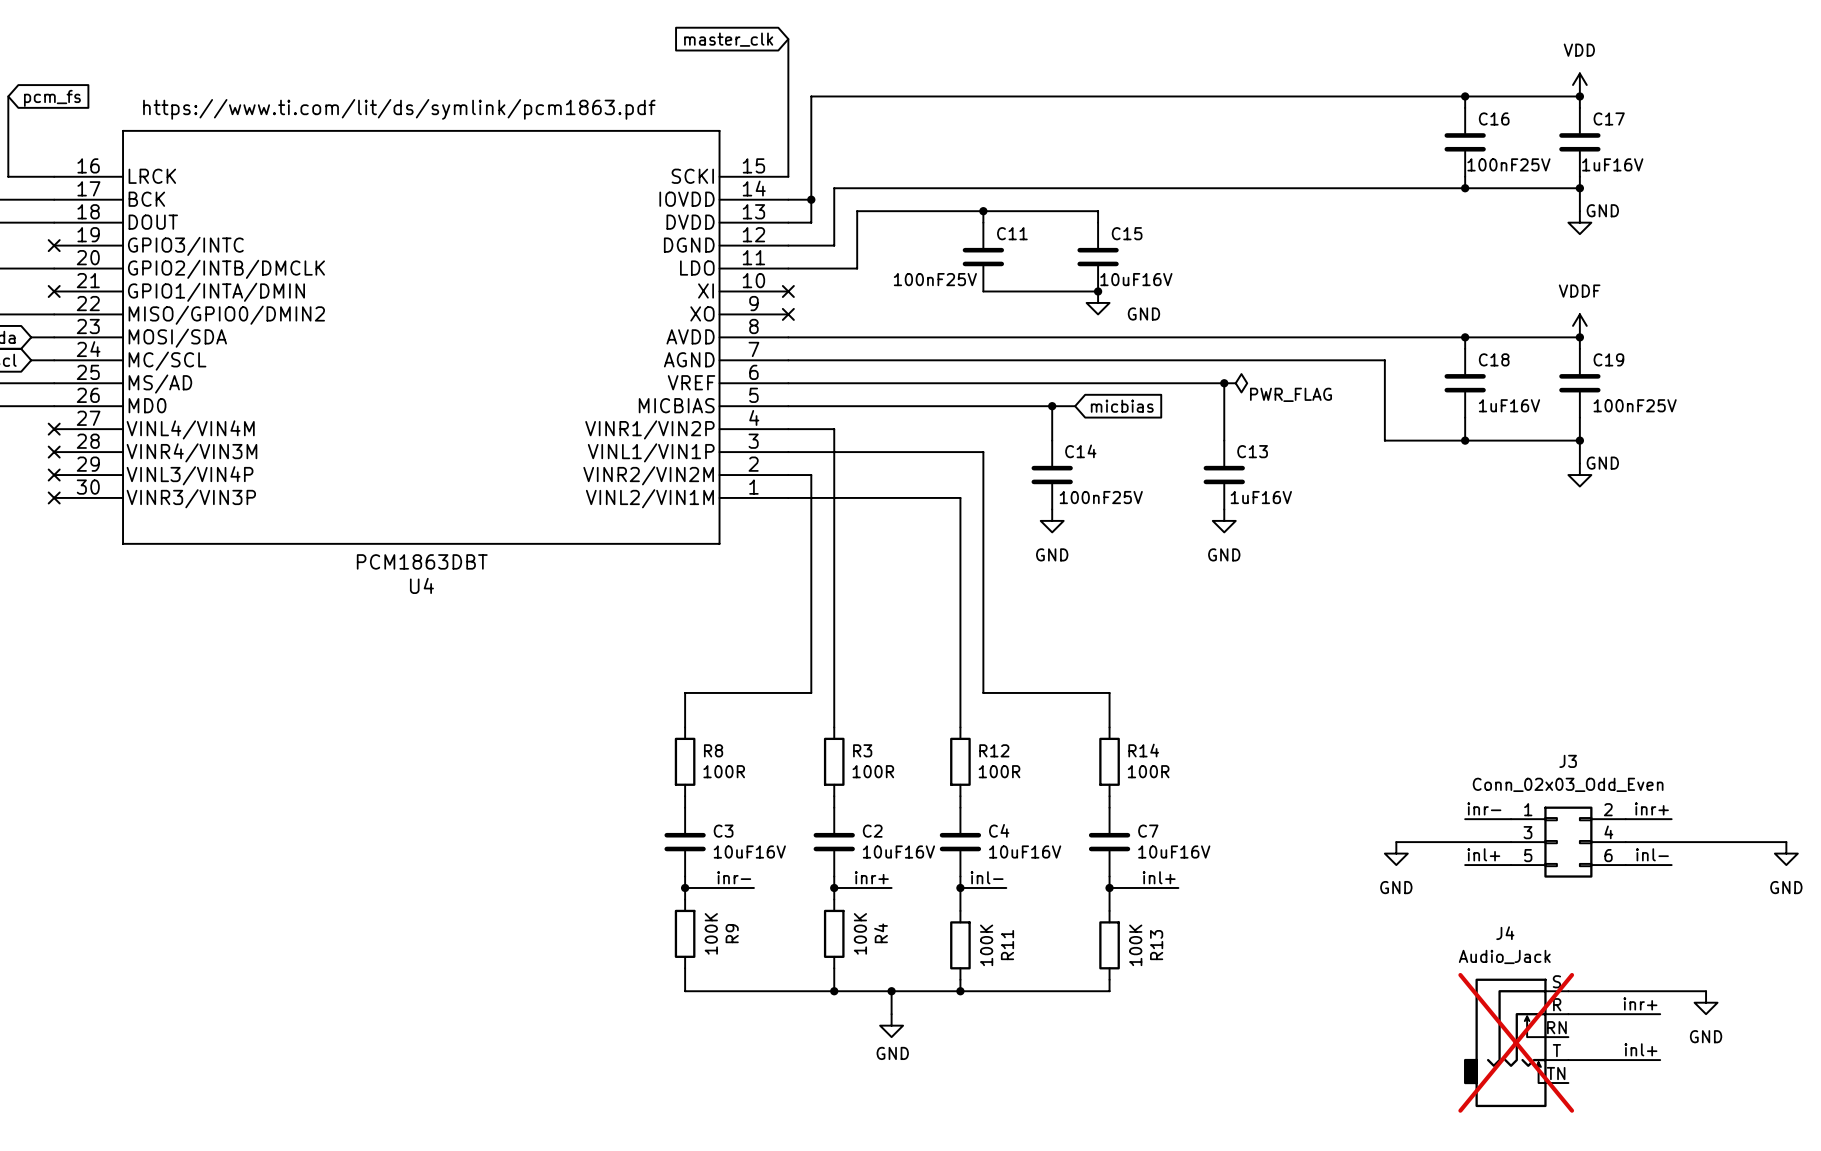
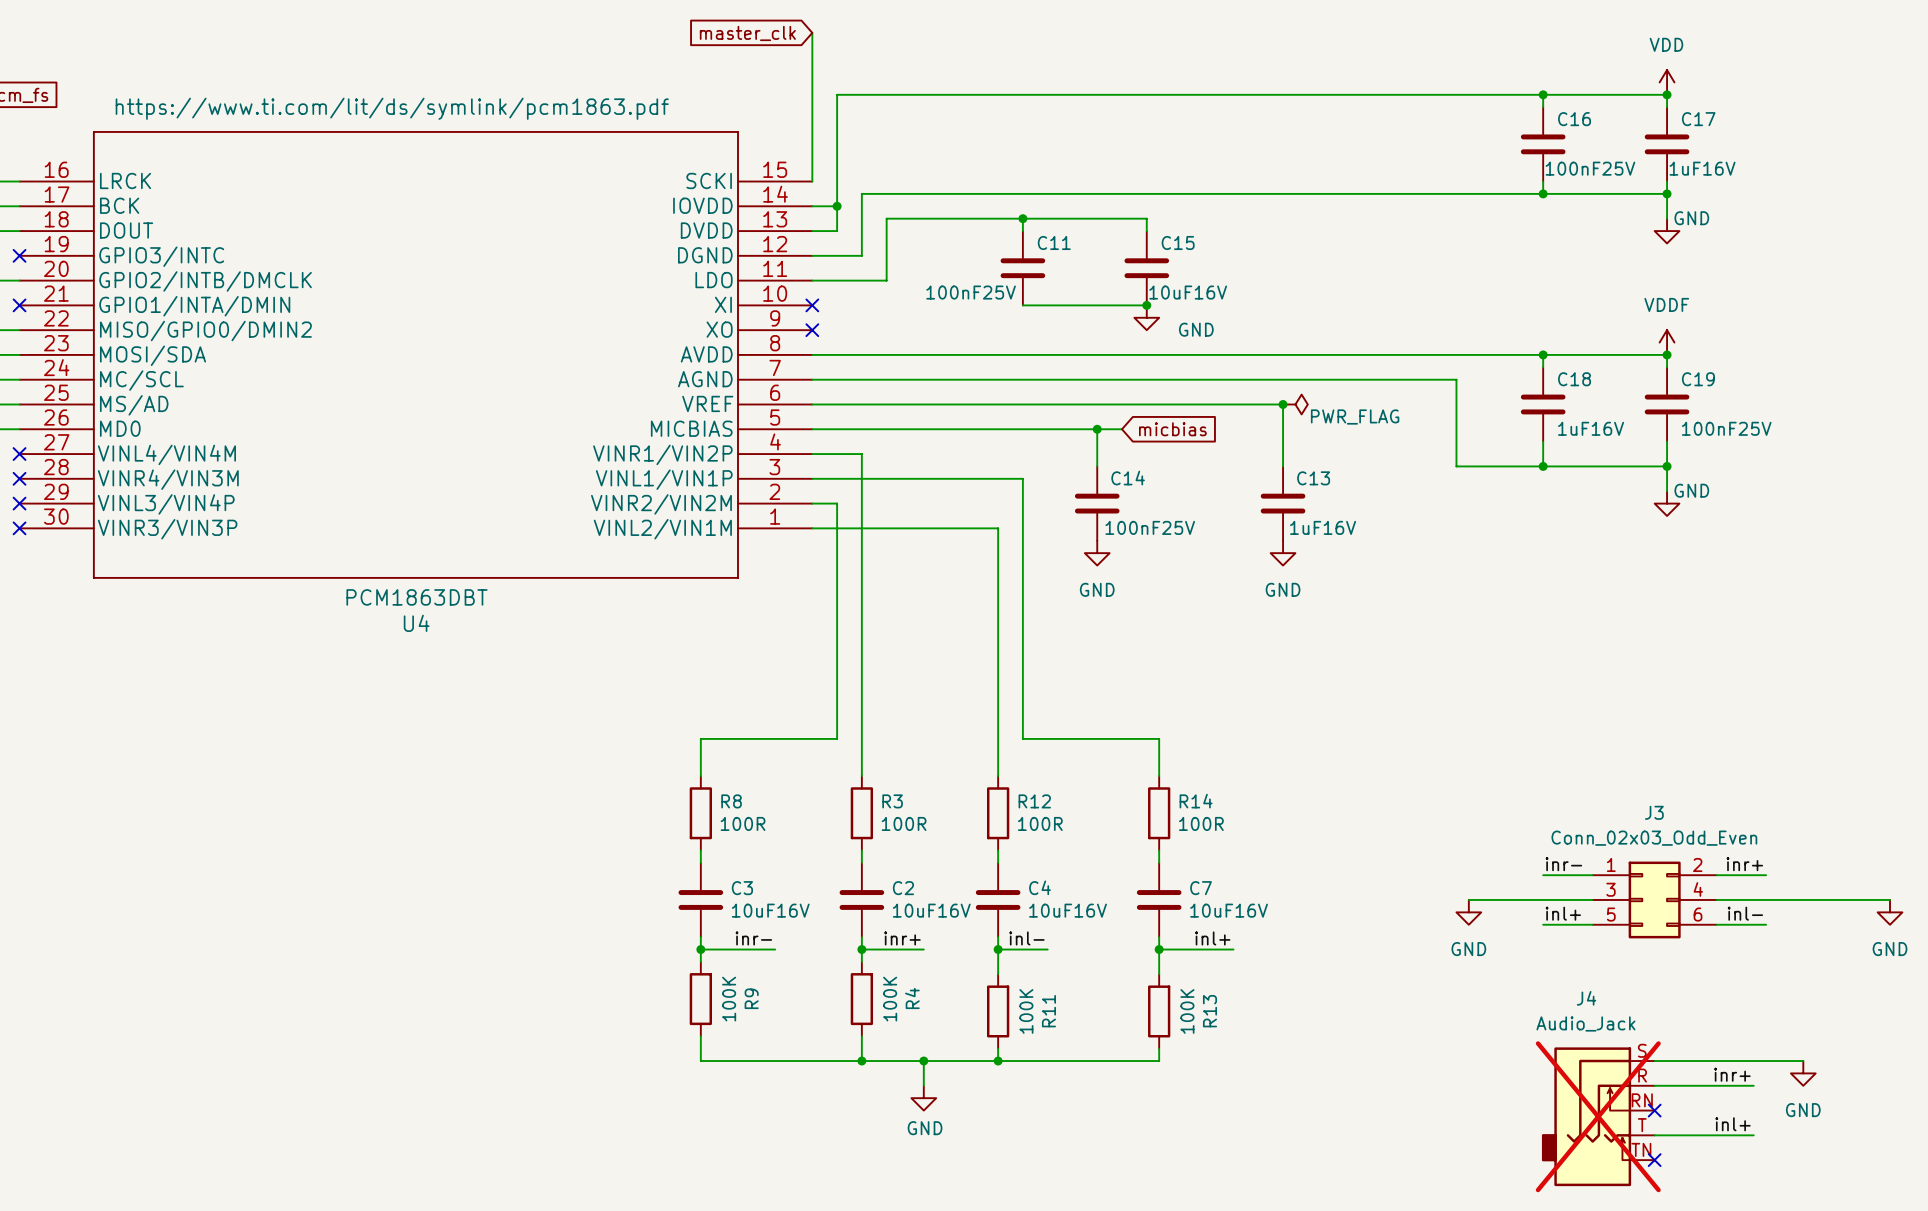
no-connect mark: none -> (1654, 1110)
no-connect mark: none -> (1654, 1160)

